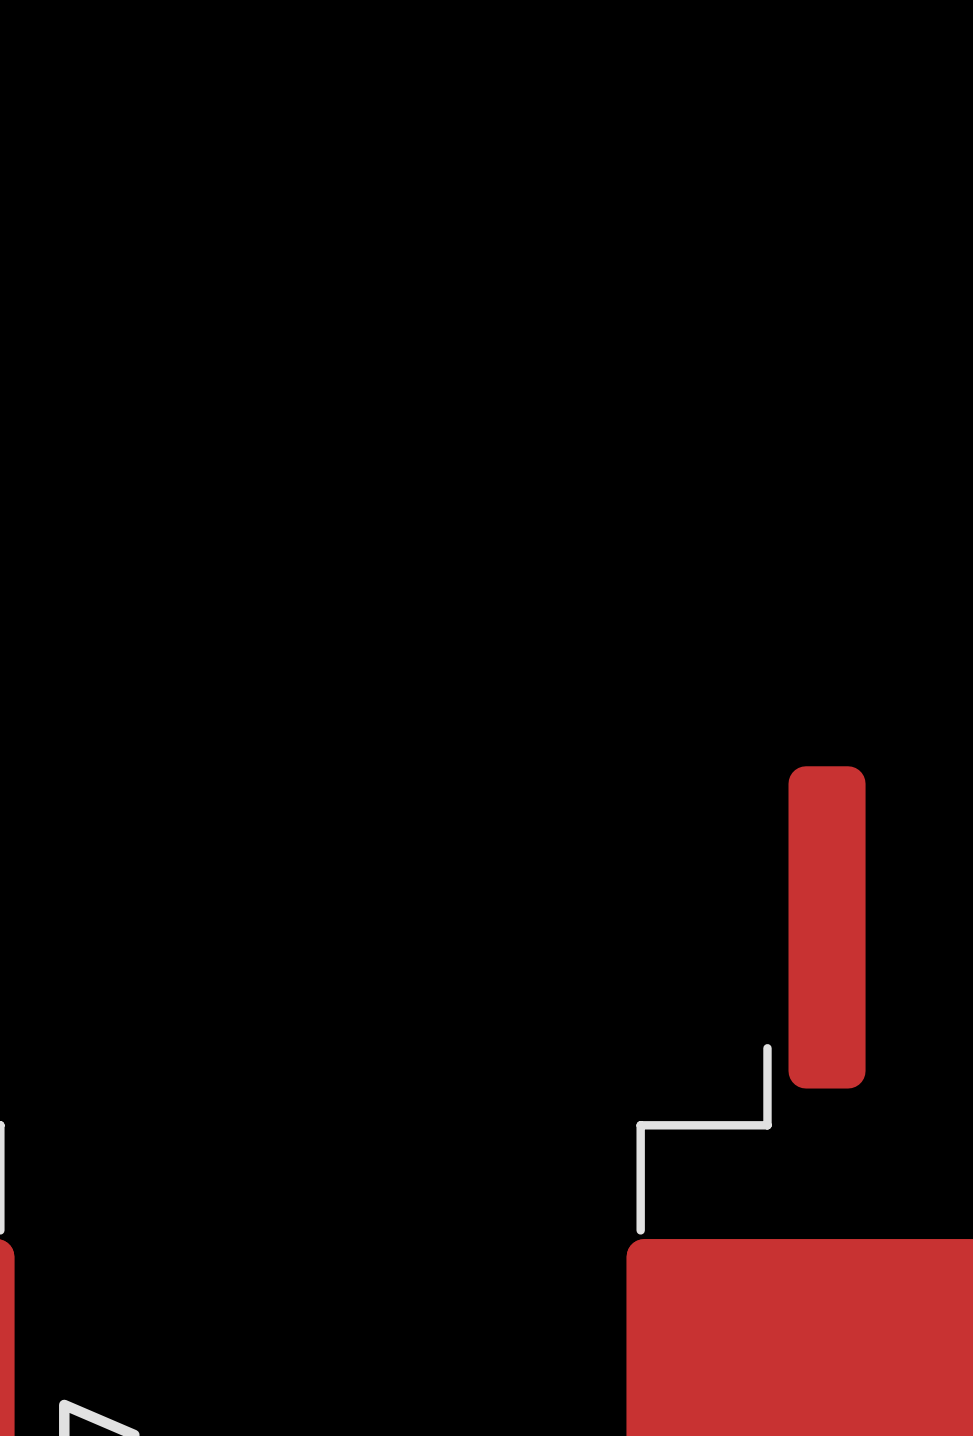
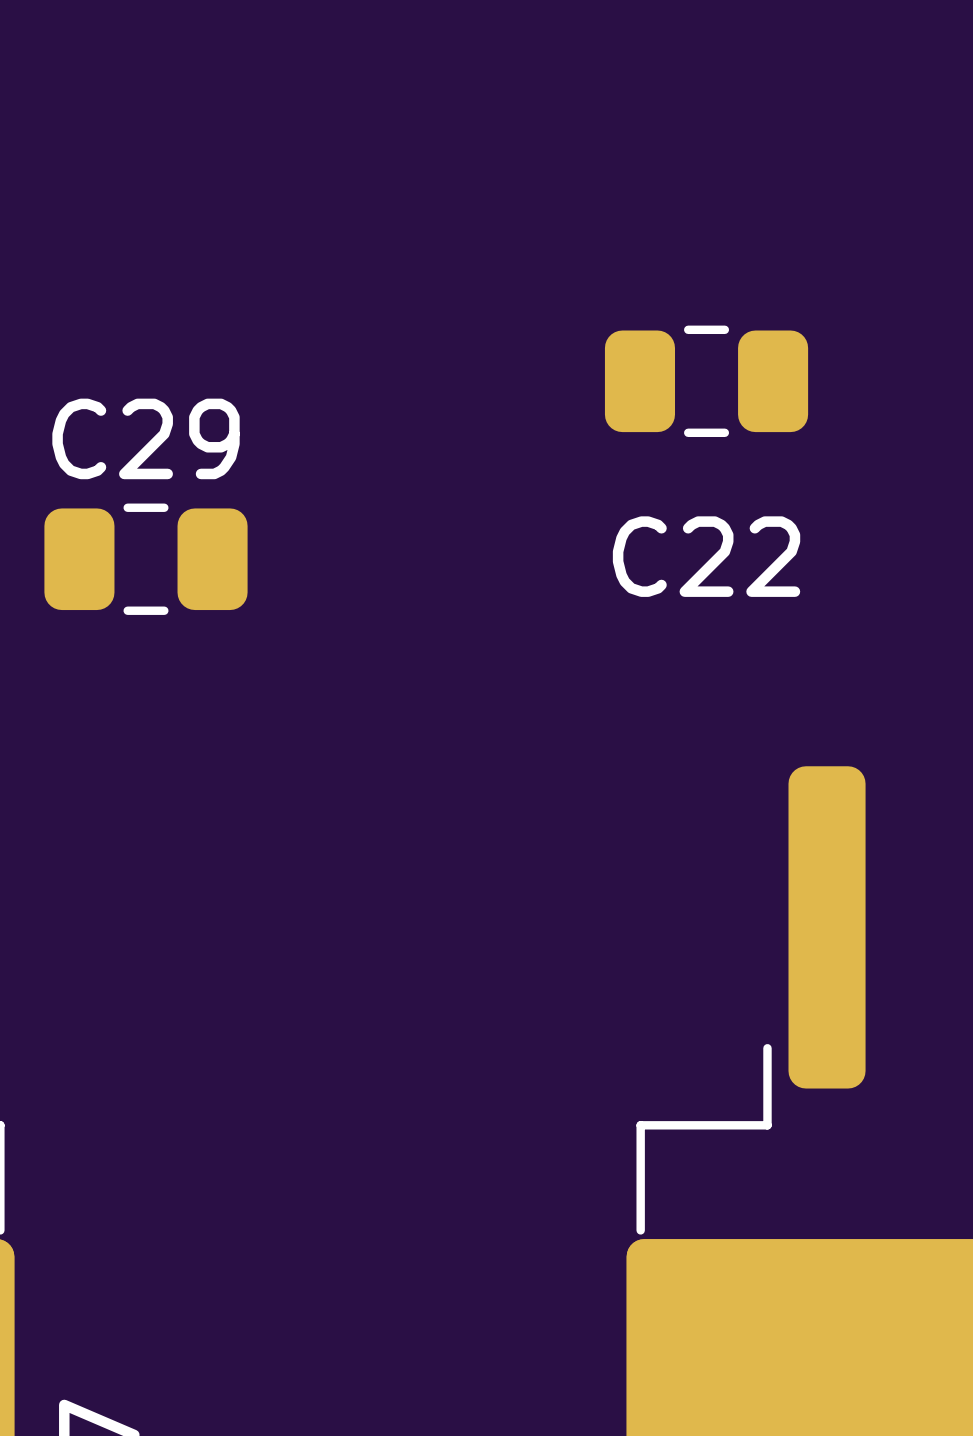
C22: none -> (706, 381)
C29: none -> (146, 559)

